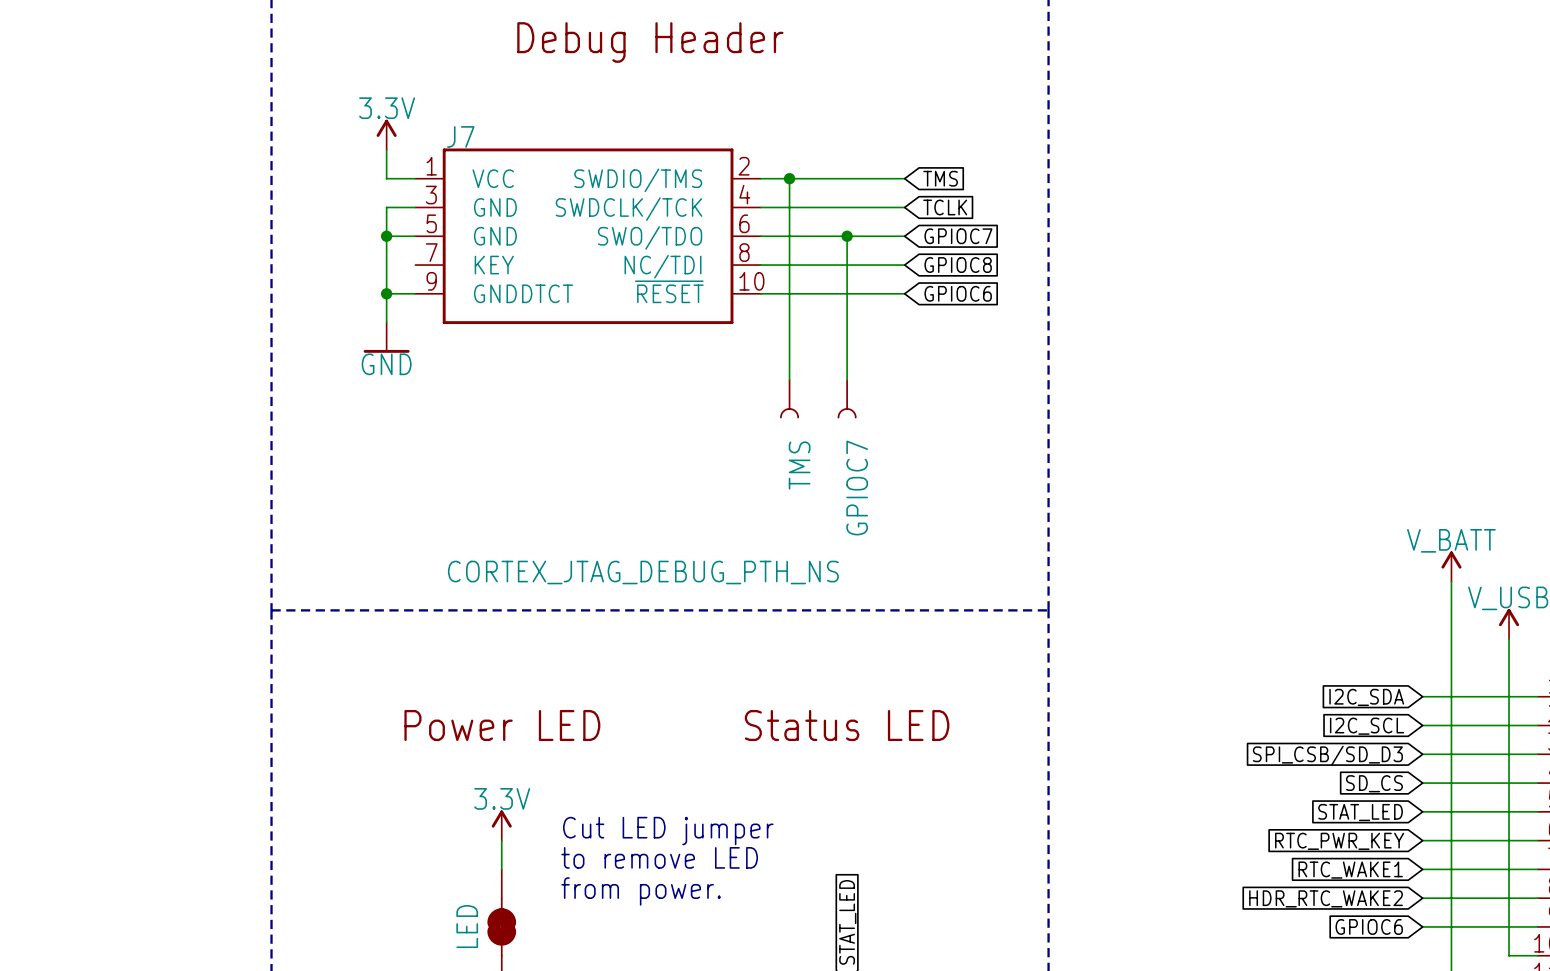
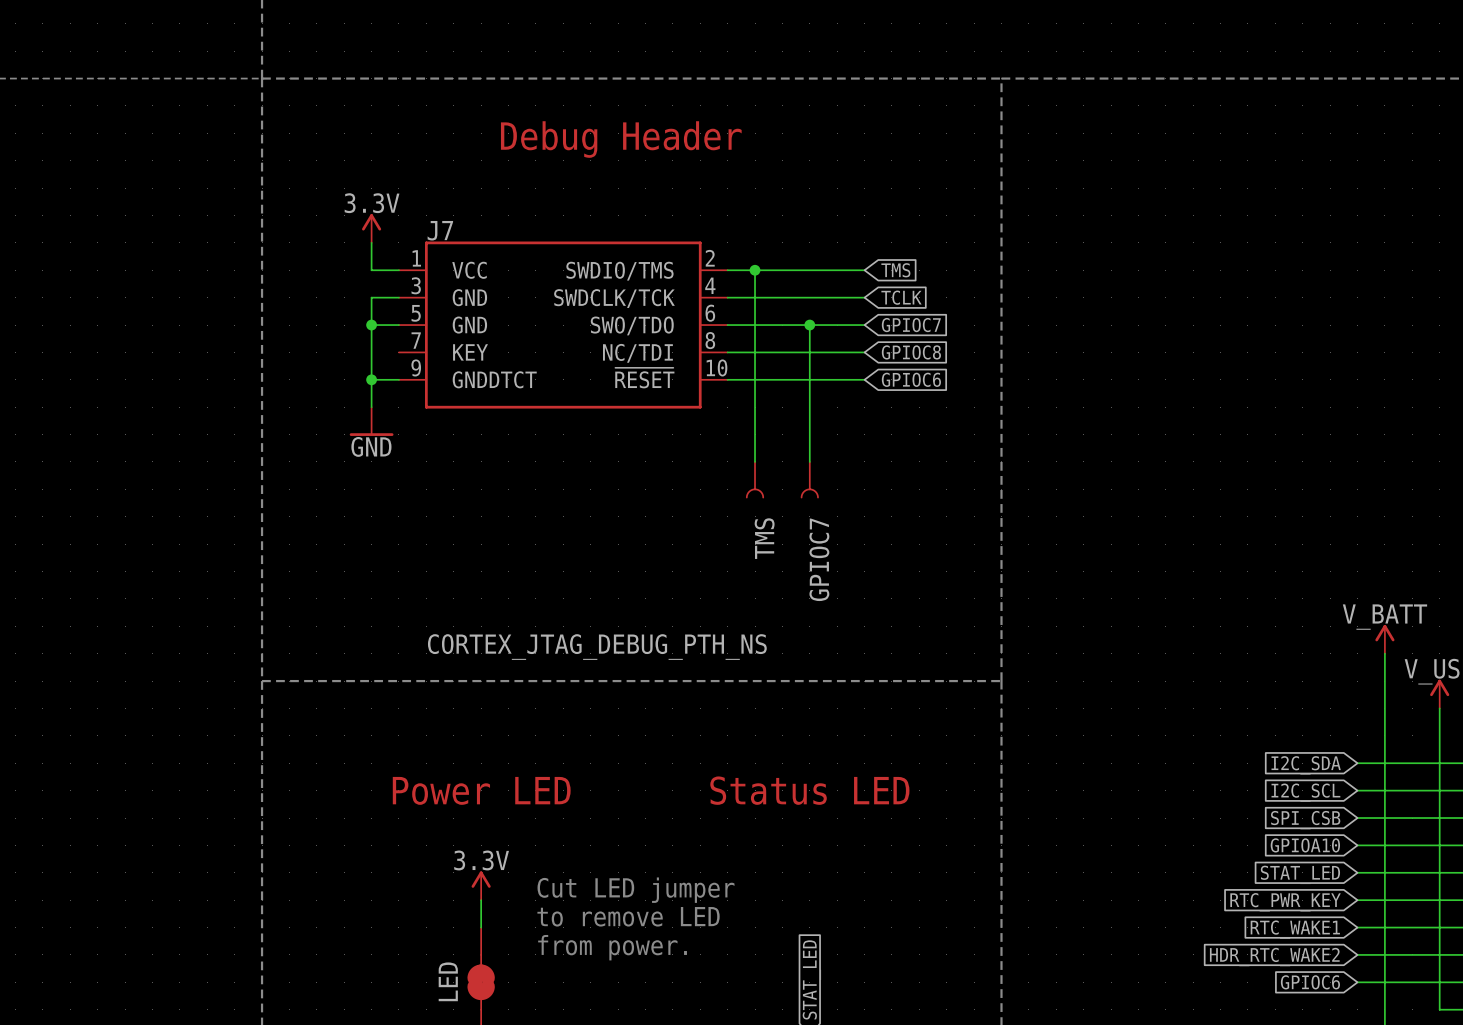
global label: SPI_CSB/SD_D3 (1327, 755) -> SPI_CSB (1305, 820)
global label: SD_CS (1374, 783) -> GPIOA10 (1305, 845)

